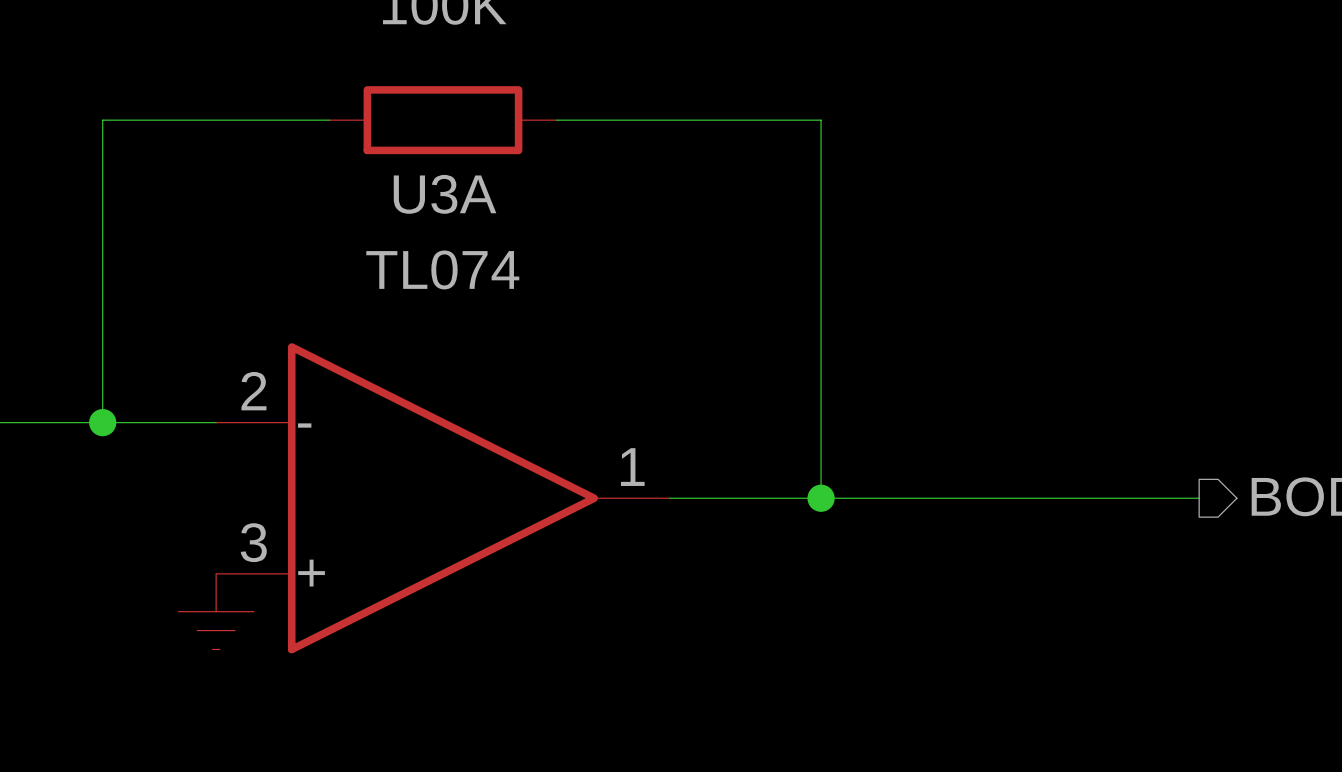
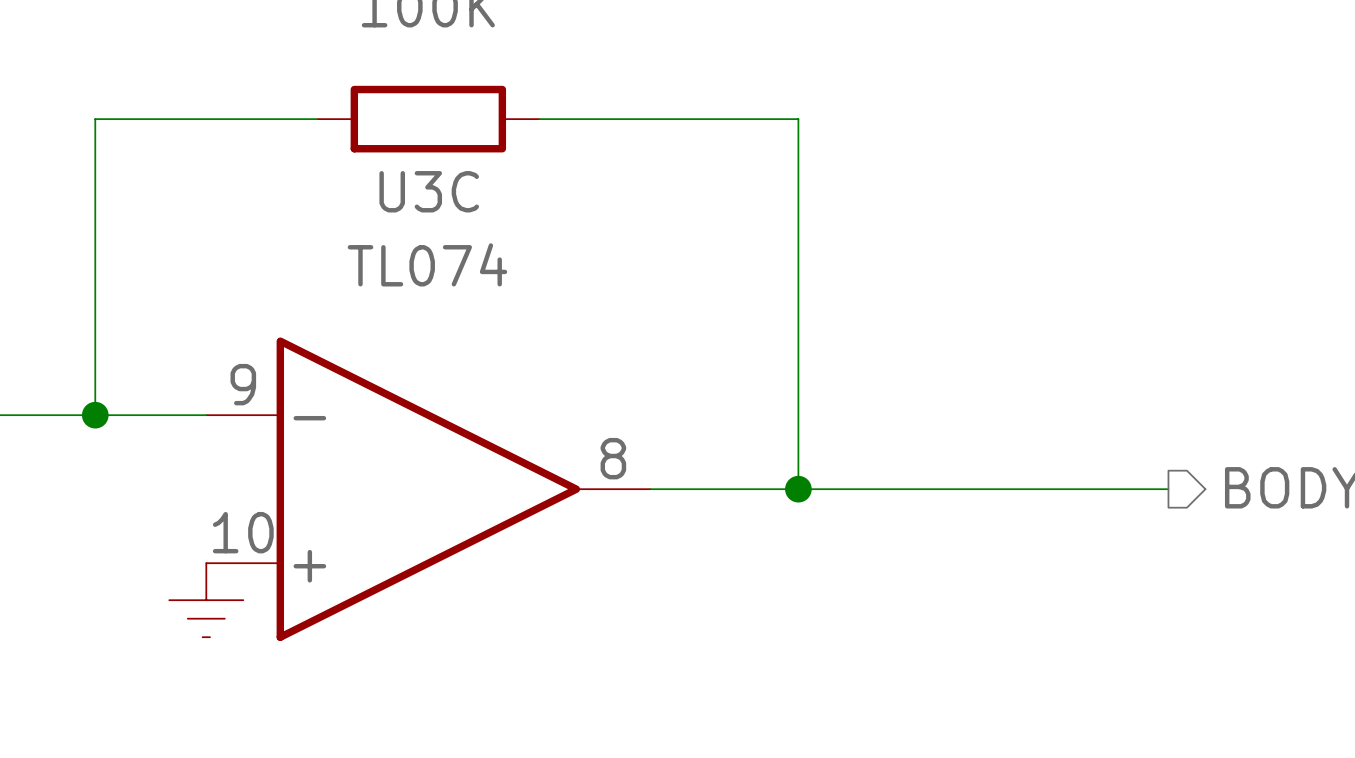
U3A name: U3A (445, 194) -> U3C (429, 191)
U3A pin number: 2 (253, 391) -> 9 (243, 384)
U3A pin number: 1 (632, 467) -> 8 (613, 458)
U3A pin number: 3 (253, 542) -> 10 (243, 532)

